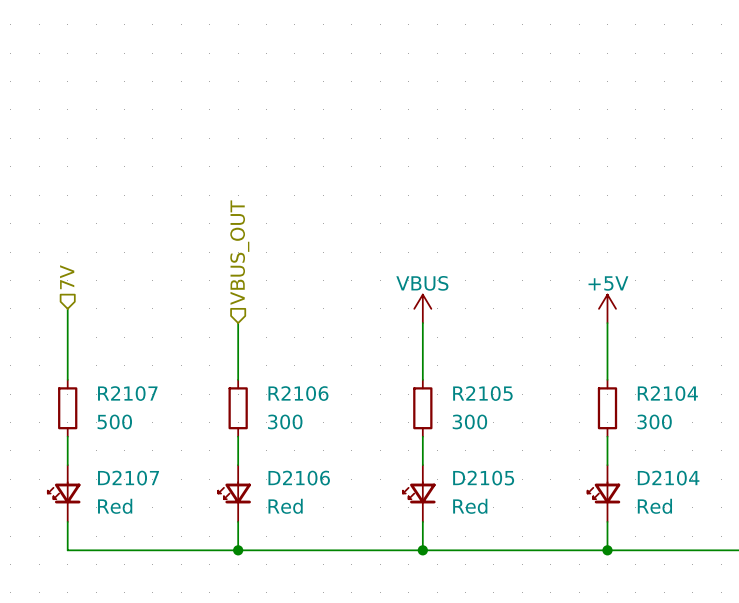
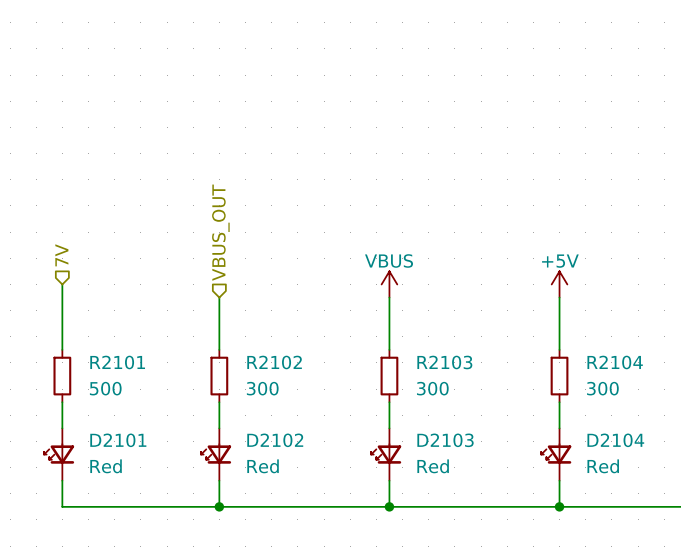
R2107 name: R2107 (127, 393) -> R2101 (117, 362)
R2106 name: R2106 (298, 393) -> R2102 (274, 362)
R2105 name: R2105 (482, 393) -> R2103 (444, 362)
D2107 name: D2107 (128, 478) -> D2101 (118, 440)
D2106 name: D2106 (299, 478) -> D2102 (275, 440)
D2105 name: D2105 (483, 478) -> D2103 (445, 440)

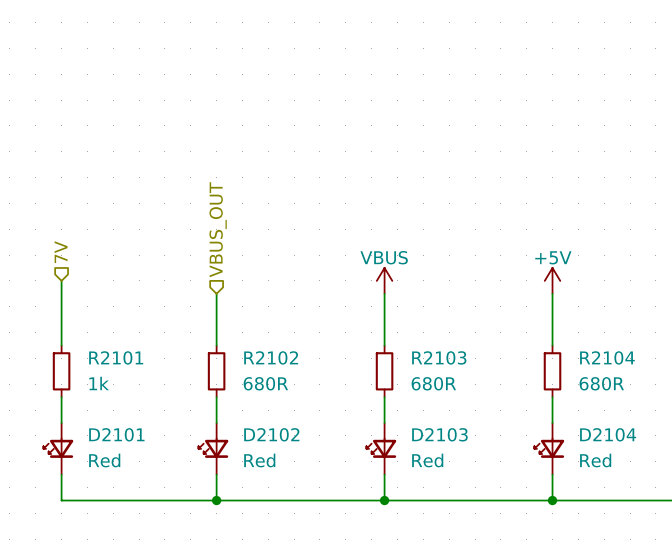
R2101 value: 500 (105, 388) -> 1k (99, 383)
R2102 value: 300 (262, 388) -> 680R (265, 383)
R2103 value: 300 (432, 388) -> 680R (433, 383)
R2104 value: 300 (602, 388) -> 680R (601, 383)

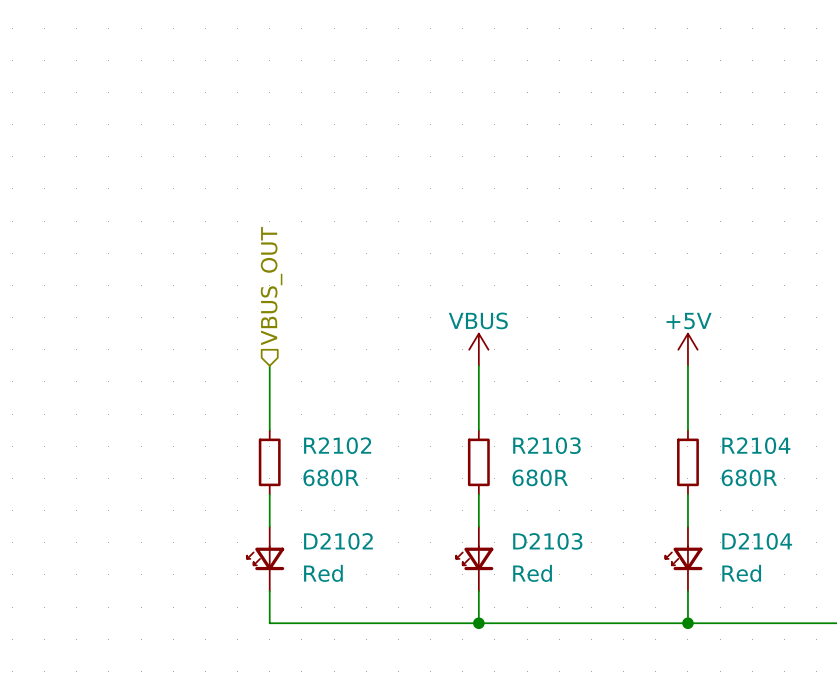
hierarchical label: 7V (61, 252) -> none
wire: (61, 280) (61, 345) -> none
R2101: 1k (61, 371) -> none
wire: (61, 397) (61, 423) -> none
D2101: Red (58, 448) -> none
wire: (61, 474) (61, 500) (216, 500) -> none
junction: (216, 500) -> none

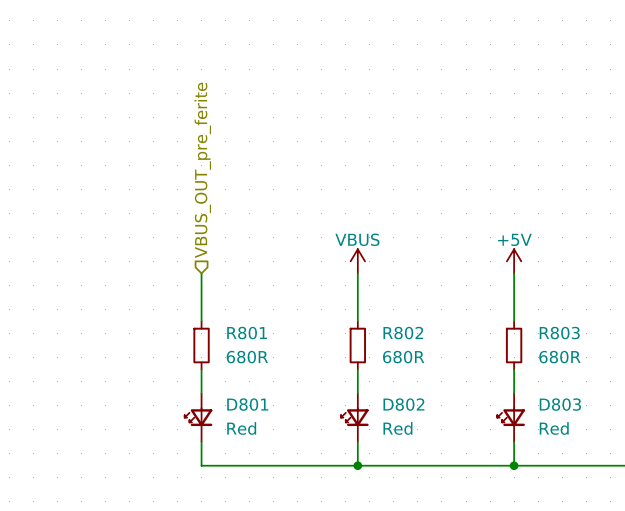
hierarchical label: VBUS_OUT (271, 286) -> VBUS_OUT_pre_ferite (202, 170)
R2102 name: R2102 (337, 445) -> R801 (247, 333)
R2103 name: R2103 (546, 445) -> R802 (403, 333)
R2104 name: R2104 (756, 445) -> R803 (559, 333)
D2102 name: D2102 (338, 541) -> D801 (247, 404)
D2103 name: D2103 (547, 541) -> D802 (403, 404)
D2104 name: D2104 (757, 541) -> D803 (560, 404)

